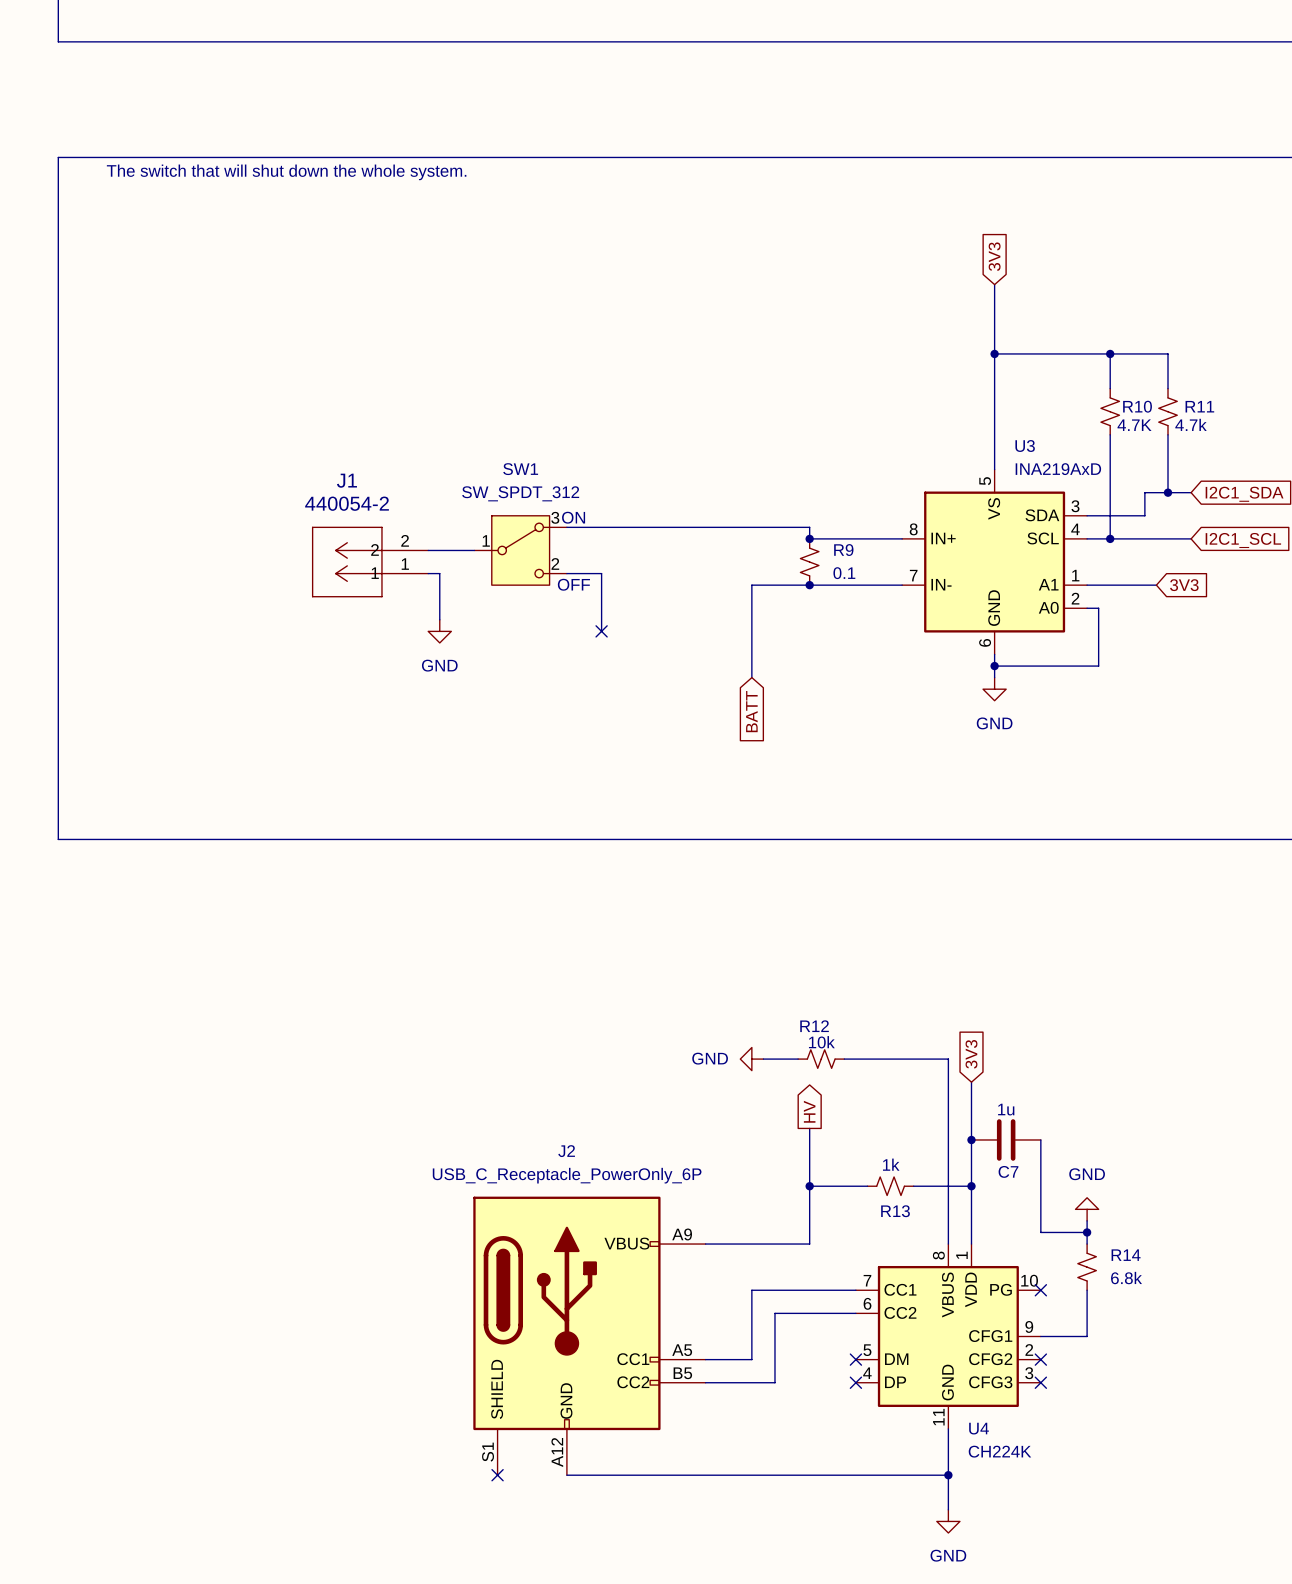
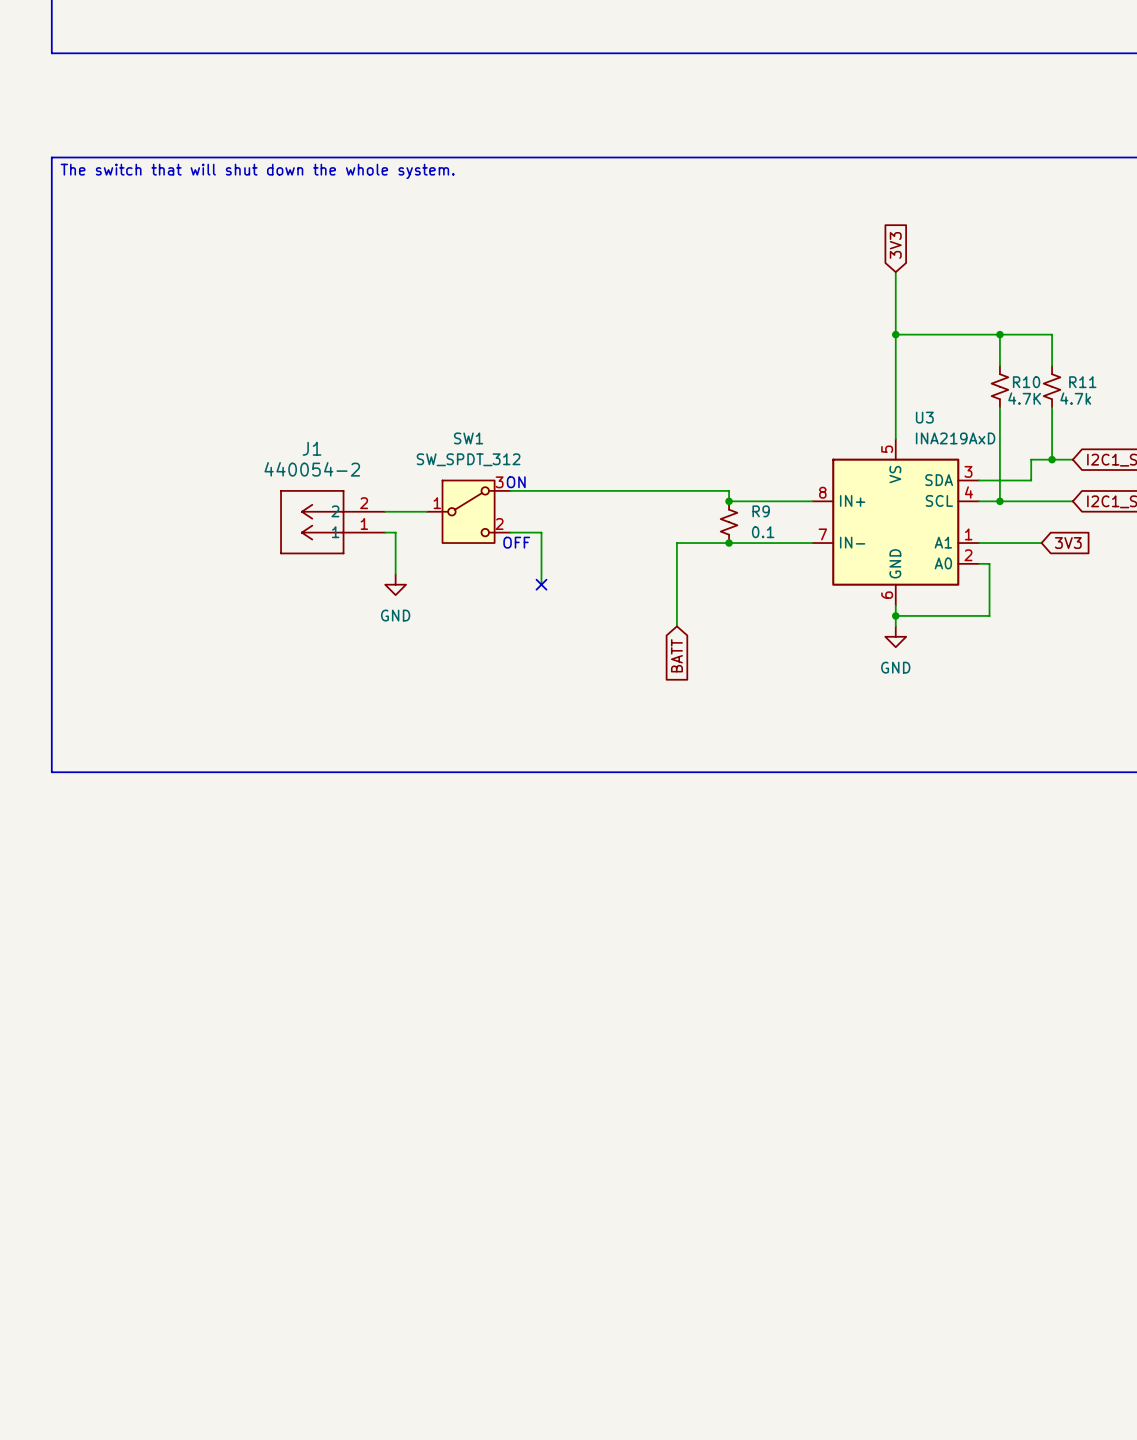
global label: 3V3 (971, 1054) -> none
power symbol: GND (751, 1059) -> none
wire: (763, 1059) (798, 1059) -> none
R12: 10k (821, 1059) -> none
wire: (844, 1059) (948, 1059) (948, 1244) -> none
wire: (971, 1082) (971, 1244) -> none
global label: HV (809, 1111) -> none
wire: (809, 1128) (809, 1244) (705, 1244) -> none
junction: (971, 1139) -> none
C7: 1u (1006, 1139) -> none
wire: (1040, 1139) (1040, 1232) (1087, 1232) -> none
wire: (809, 1186) (867, 1186) -> none
junction: (809, 1186) -> none
R13: 1k (890, 1186) -> none
wire: (913, 1186) (971, 1186) -> none
junction: (971, 1186) -> none
power symbol: GND (1087, 1209) -> none
wire: (1087, 1220) (1087, 1244) -> none
junction: (1087, 1232) -> none
R14: 6.8k (1087, 1267) -> none
wire: (855, 1290) (751, 1290) (751, 1359) (705, 1359) -> none
no-connect mark: (1040, 1290) -> none
wire: (1087, 1290) (1087, 1336) (1040, 1336) -> none
wire: (855, 1313) (774, 1313) (774, 1382) (705, 1382) -> none
J2: USB_C_Receptacle_PowerOnly_6P (589, 1335) -> none
U4: CH224K (948, 1336) -> none
no-connect mark: (855, 1359) -> none
no-connect mark: (1040, 1359) -> none
no-connect mark: (855, 1382) -> none
no-connect mark: (1040, 1382) -> none
wire: (948, 1428) (948, 1509) -> none
no-connect mark: (497, 1475) -> none
wire: (566, 1475) (948, 1475) -> none
junction: (948, 1475) -> none
power symbol: GND (948, 1521) -> none

